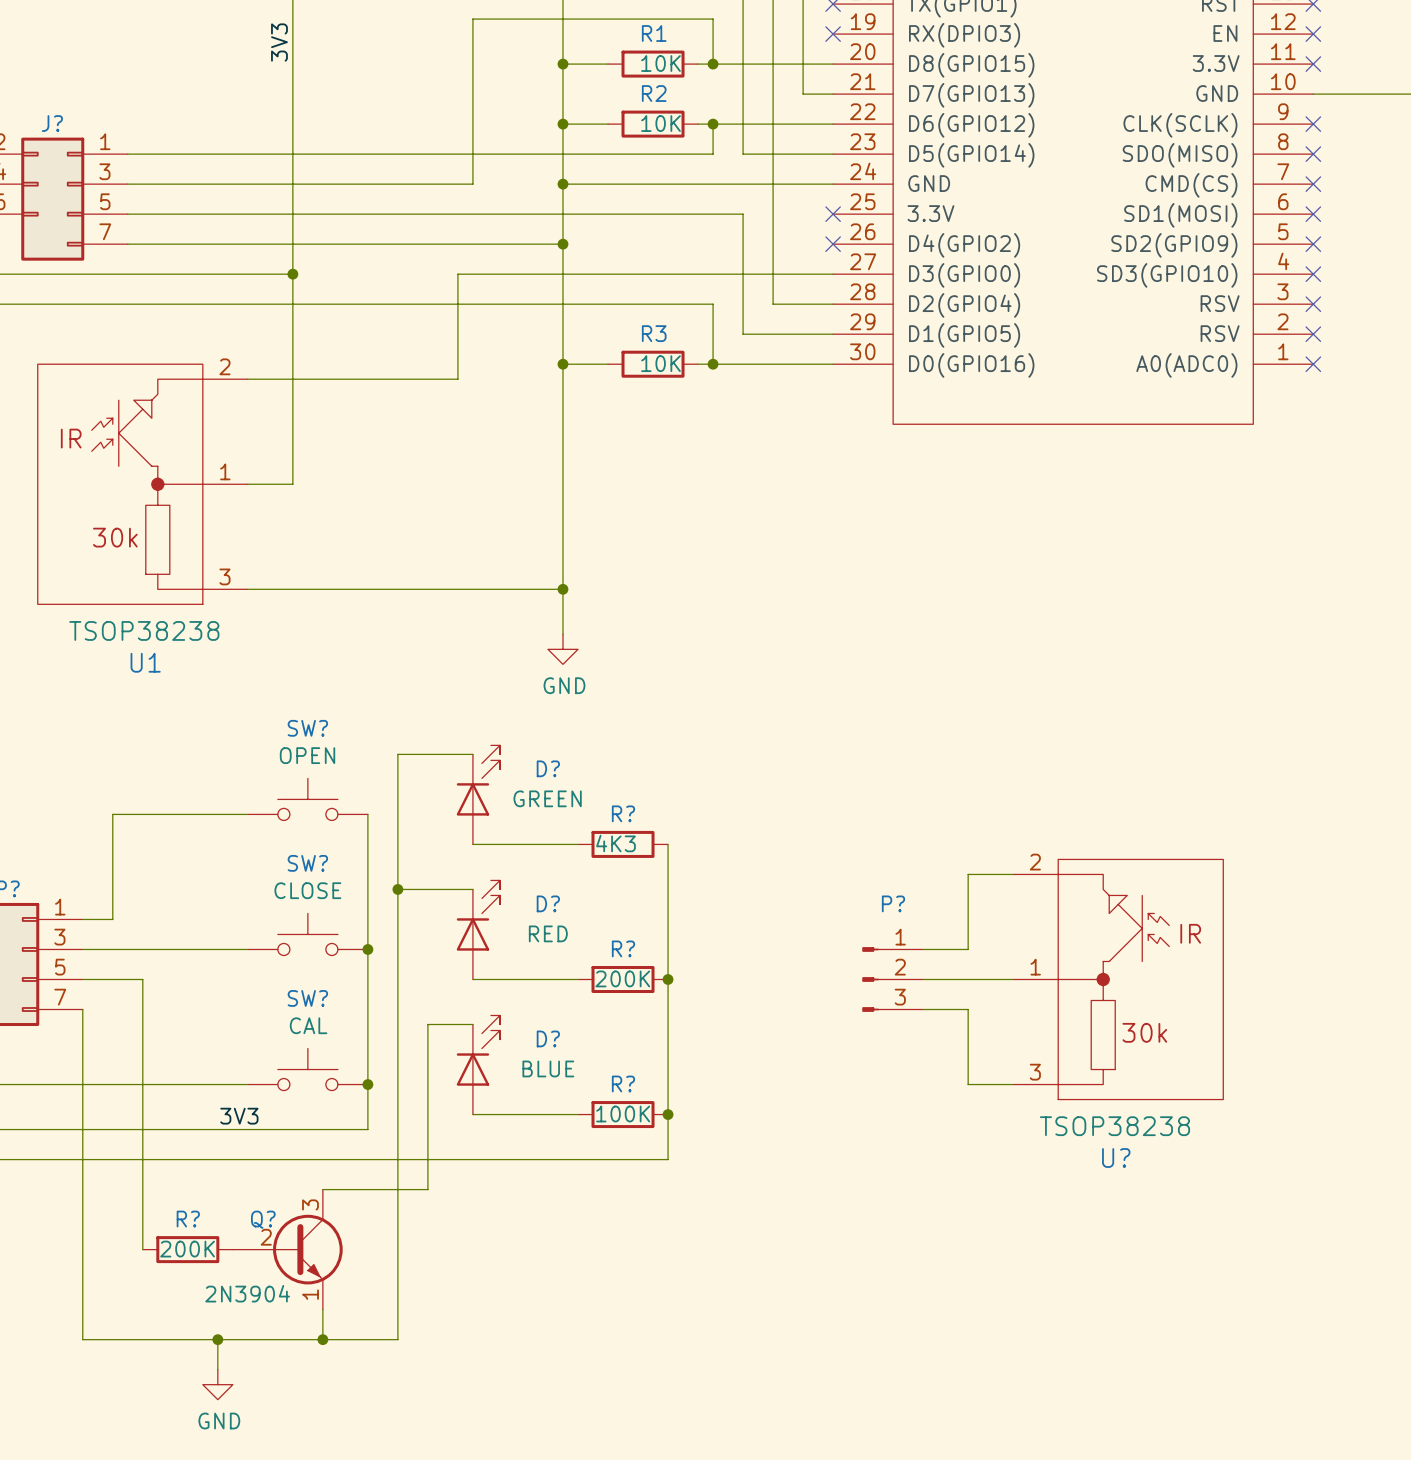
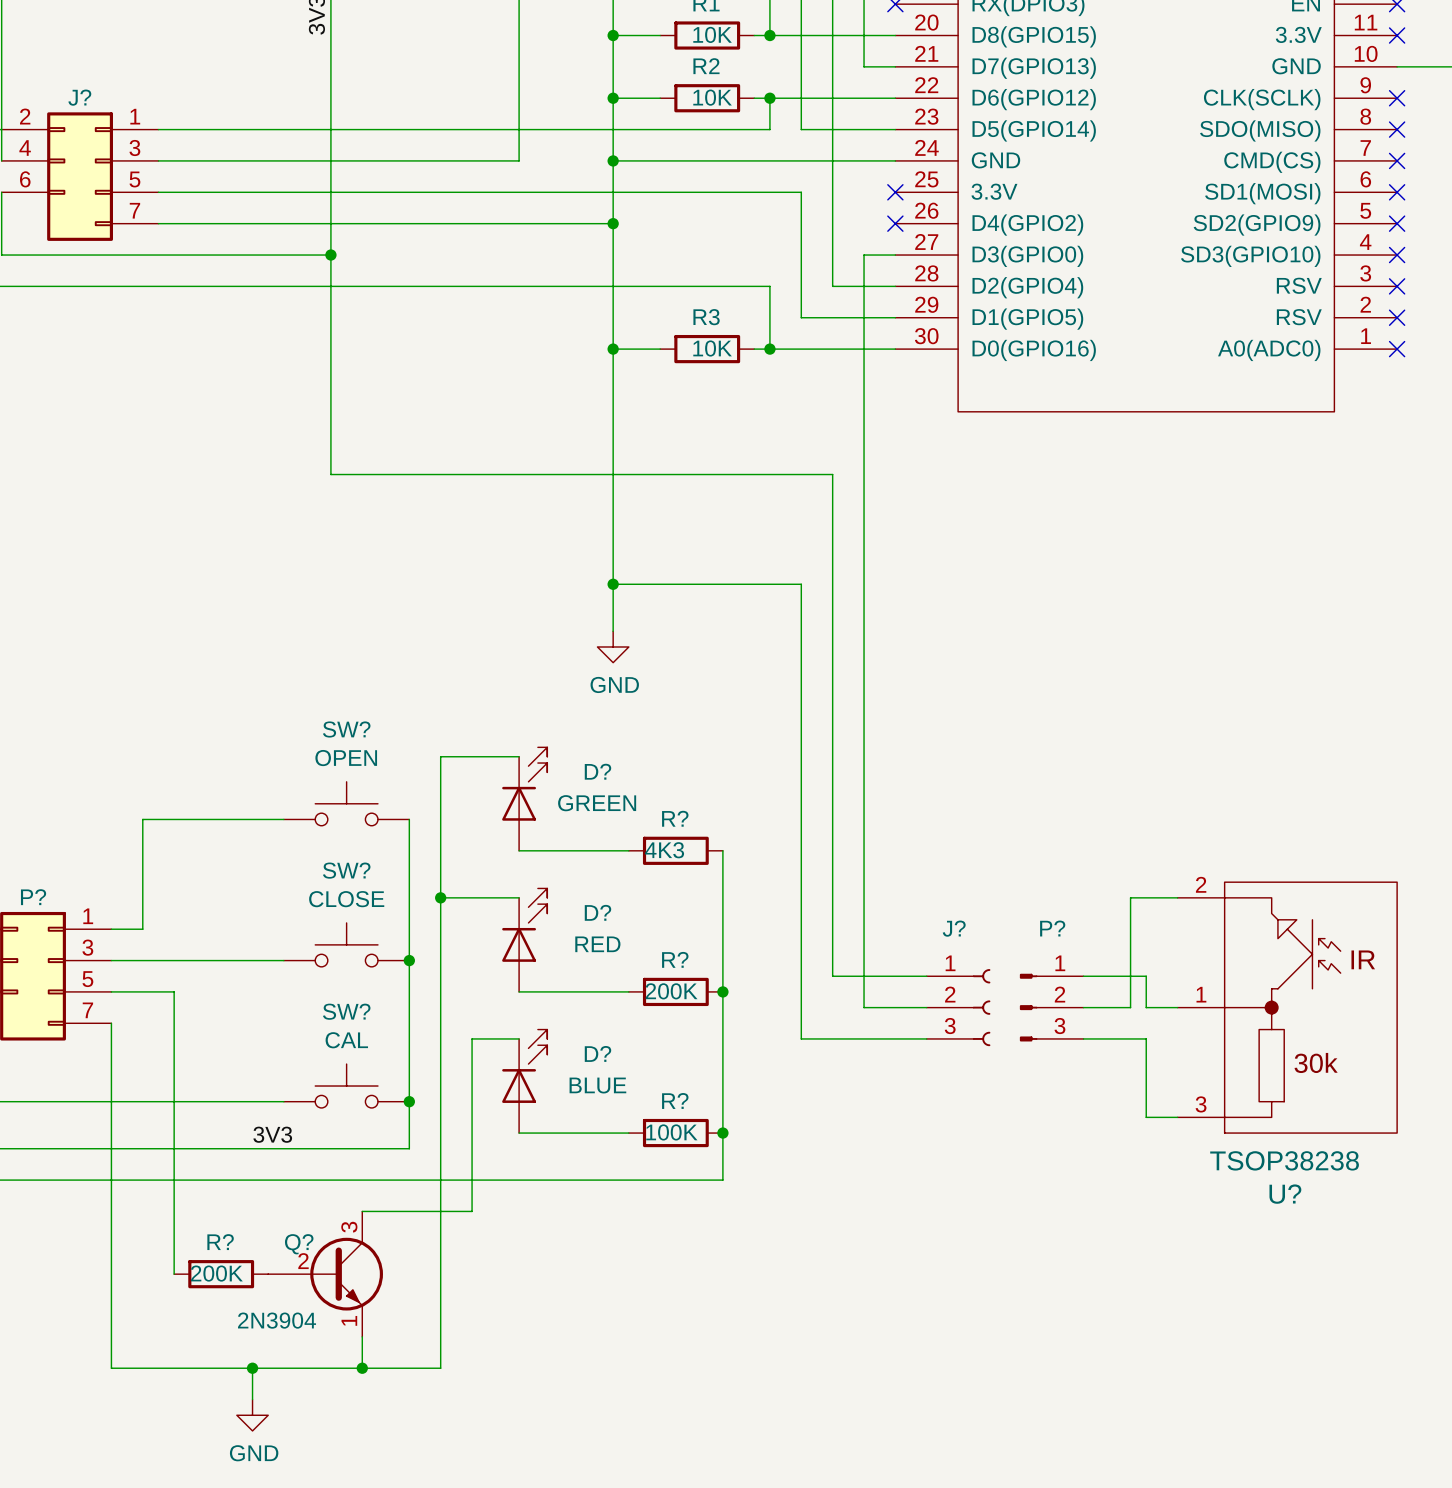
wire: (803, 274) (457, 274) (457, 379) (247, 379) -> (864, 255) (864, 1007) (926, 1007)
U1: TSOP38238 (142, 484) -> none
wire: (247, 484) (292, 484) -> (926, 976) (832, 976) (832, 474) (330, 474)
wire: (247, 589) (562, 589) -> (926, 1038) (801, 1038) (801, 584) (613, 584)
wire: (1013, 874) (968, 874) (968, 949) (923, 949) -> none
wire: none -> (1177, 897) (1130, 897) (1130, 1007) (1083, 1007)
wire: none -> (1083, 976) (1146, 976) (1146, 1007) (1177, 1007)
P? position: (892, 979) -> (1051, 1007)
wire: (923, 979) (1013, 979) -> none
U? position: (1118, 979) -> (1287, 1007)
J?: none -> (958, 1007)
wire: (923, 1009) (968, 1009) (968, 1084) (1013, 1084) -> none
wire: none -> (1083, 1038) (1146, 1038) (1146, 1117) (1177, 1117)

